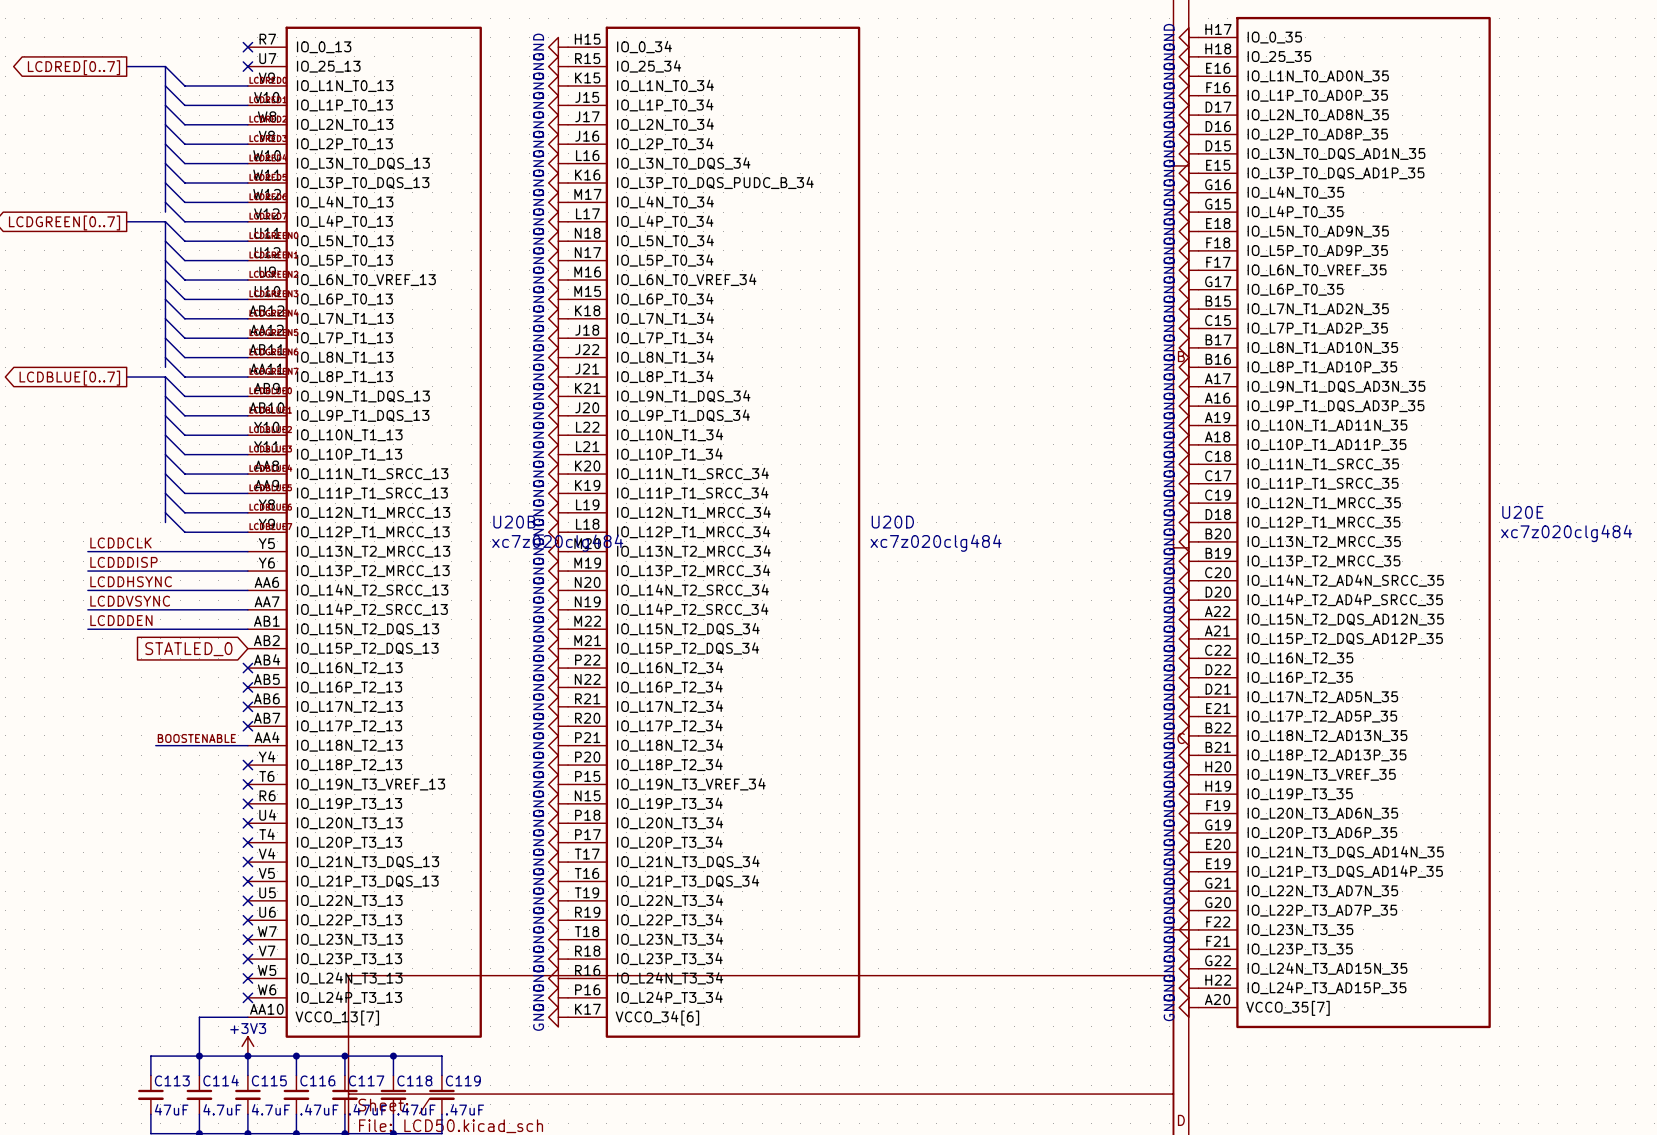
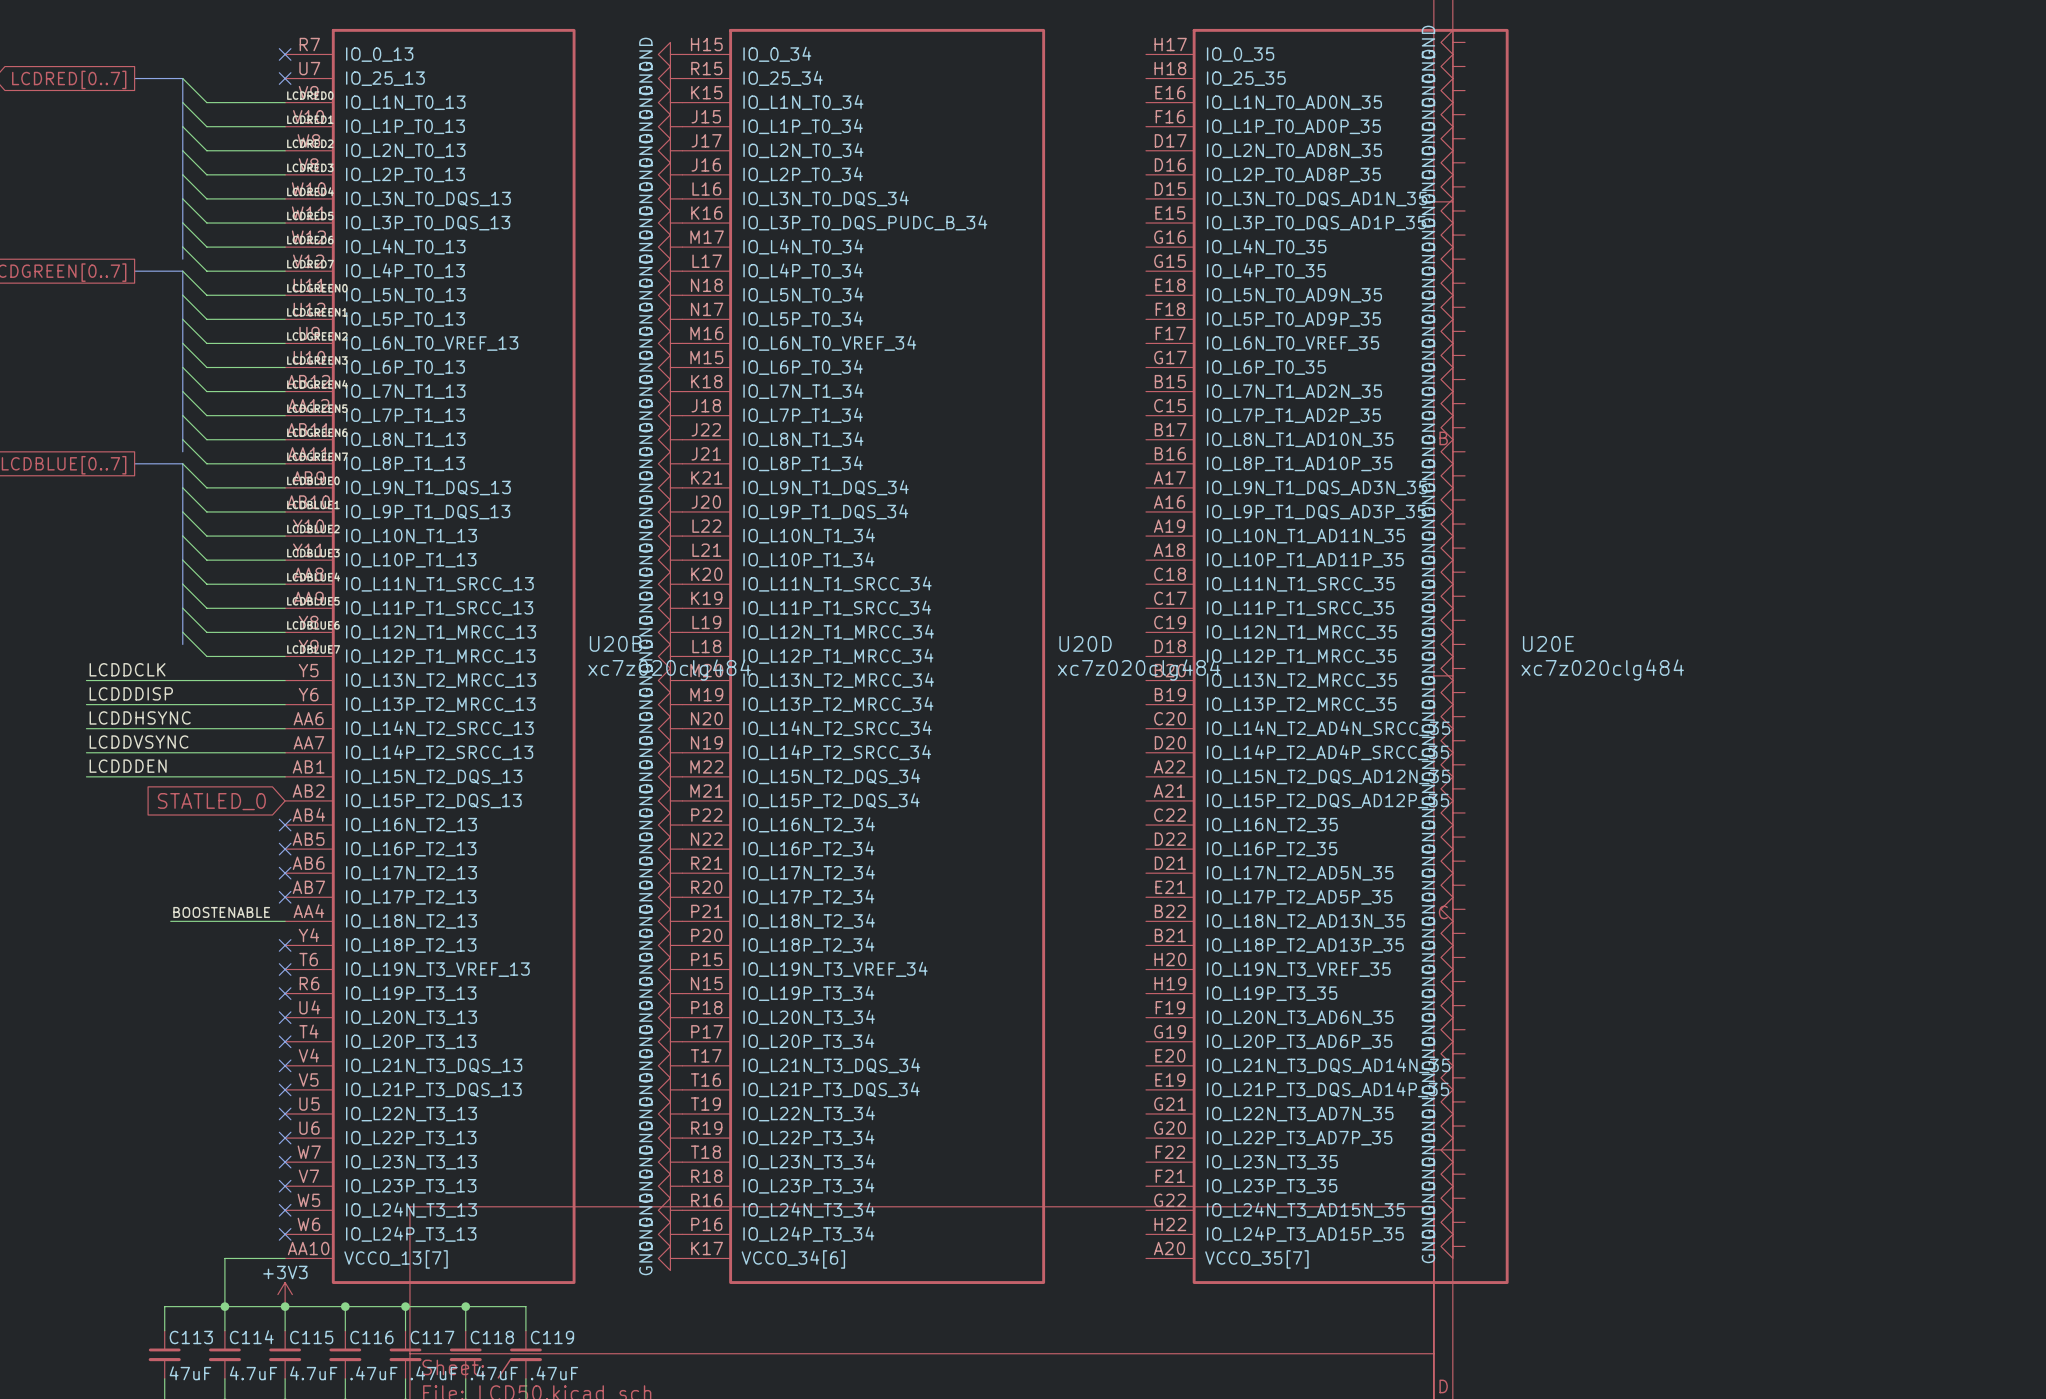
U20E position: (1344, 522) -> (1327, 656)

